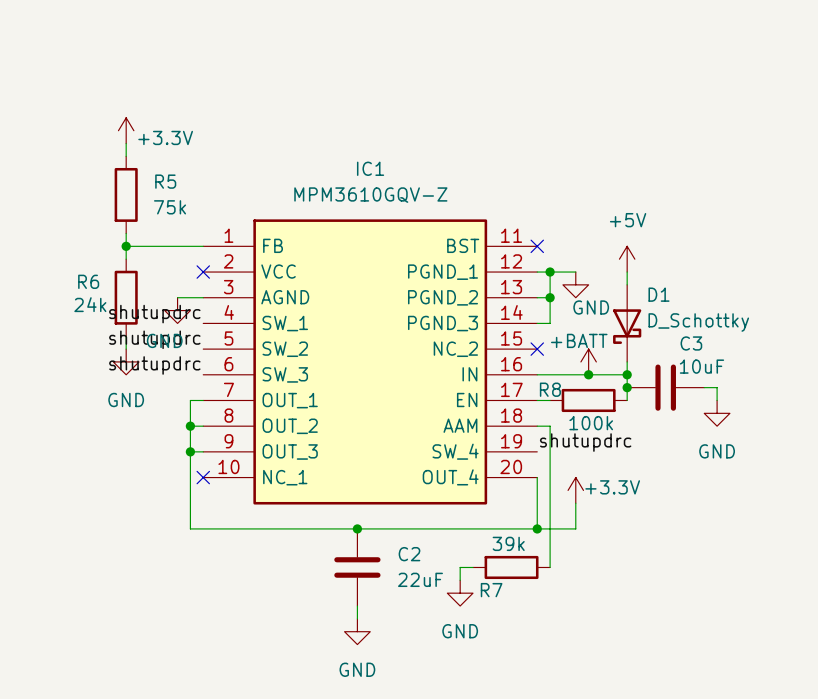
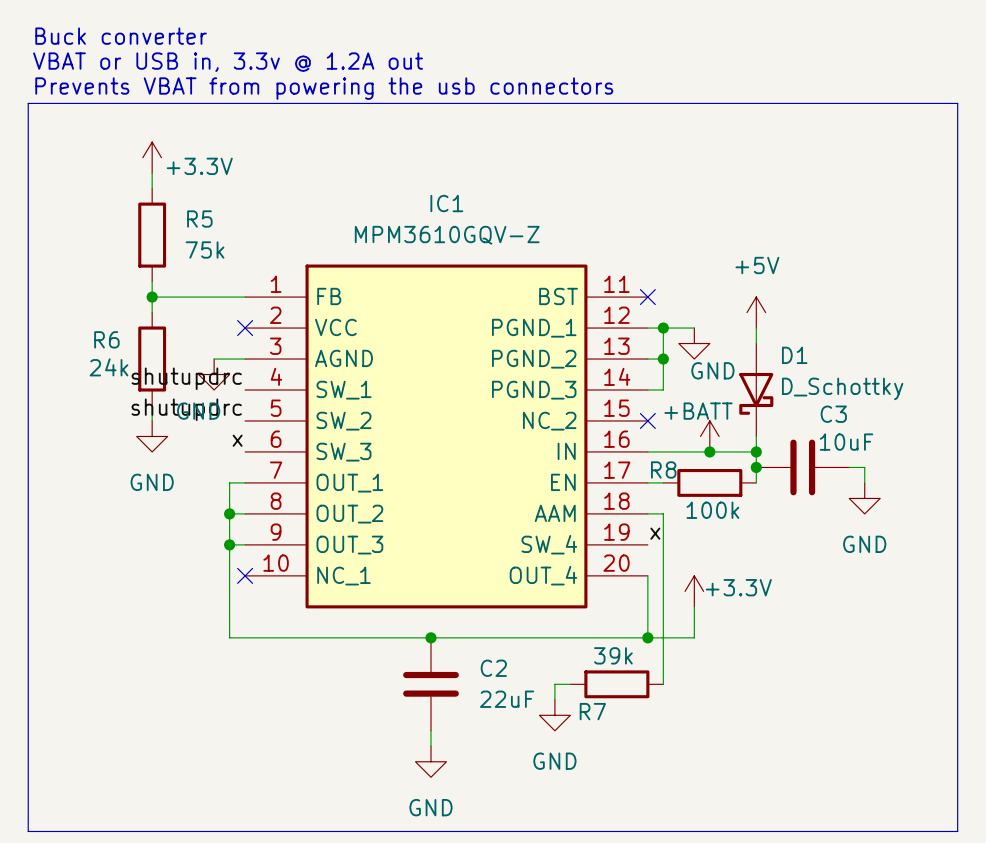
text: none -> Buck converter (121, 36)
text: none -> VBAT or USB in, 3.3v @ 1.2A out (228, 62)
text: none -> Prevents VBAT from powering the usb connectors (324, 88)
line: none -> (28, 103) (957, 103) (957, 831) (28, 831) (28, 103)
label: shutupdrc (154, 365) -> x (237, 440)
label: shutupdrc (585, 442) -> x (655, 533)

